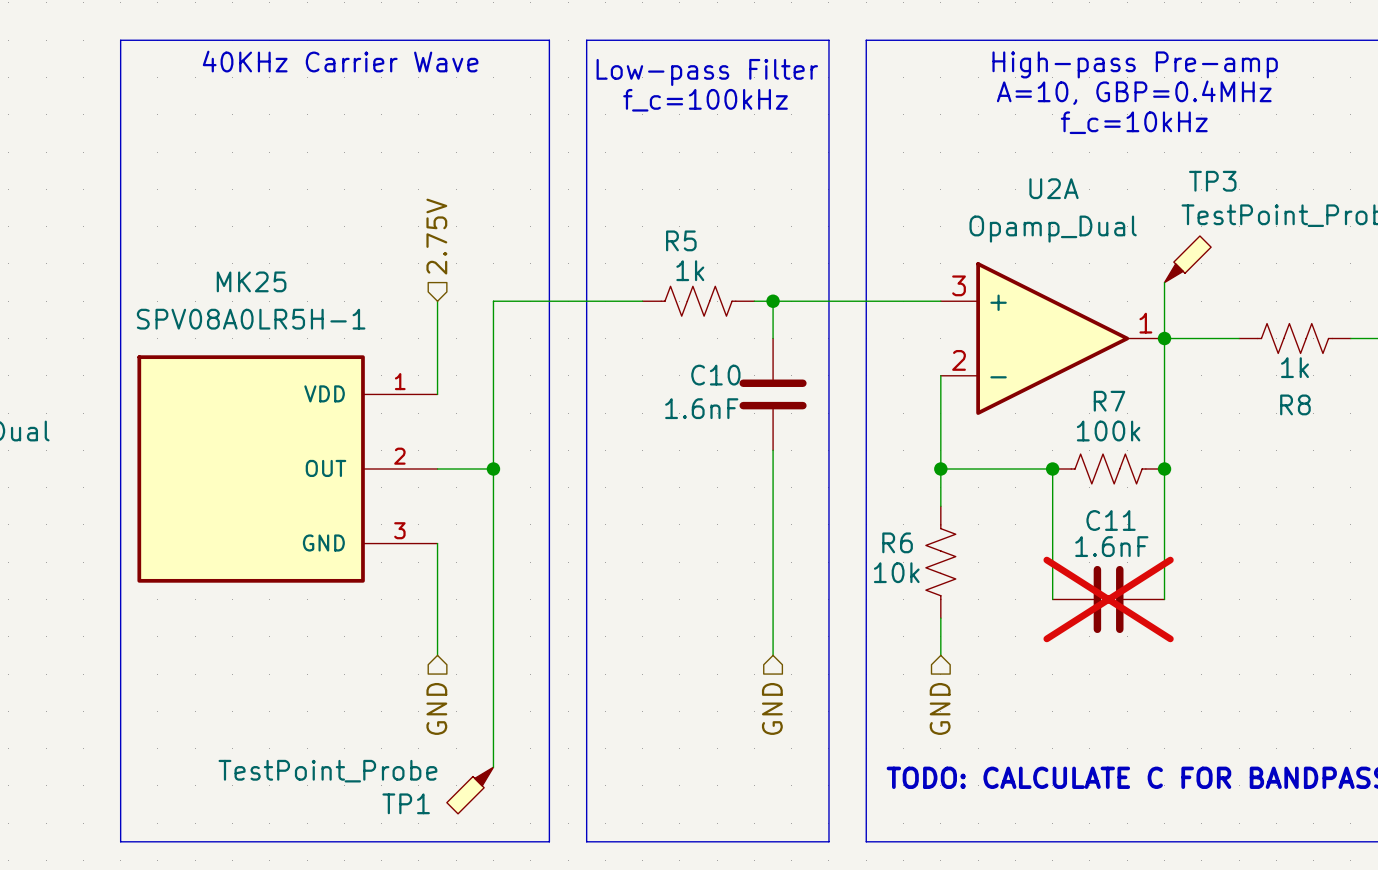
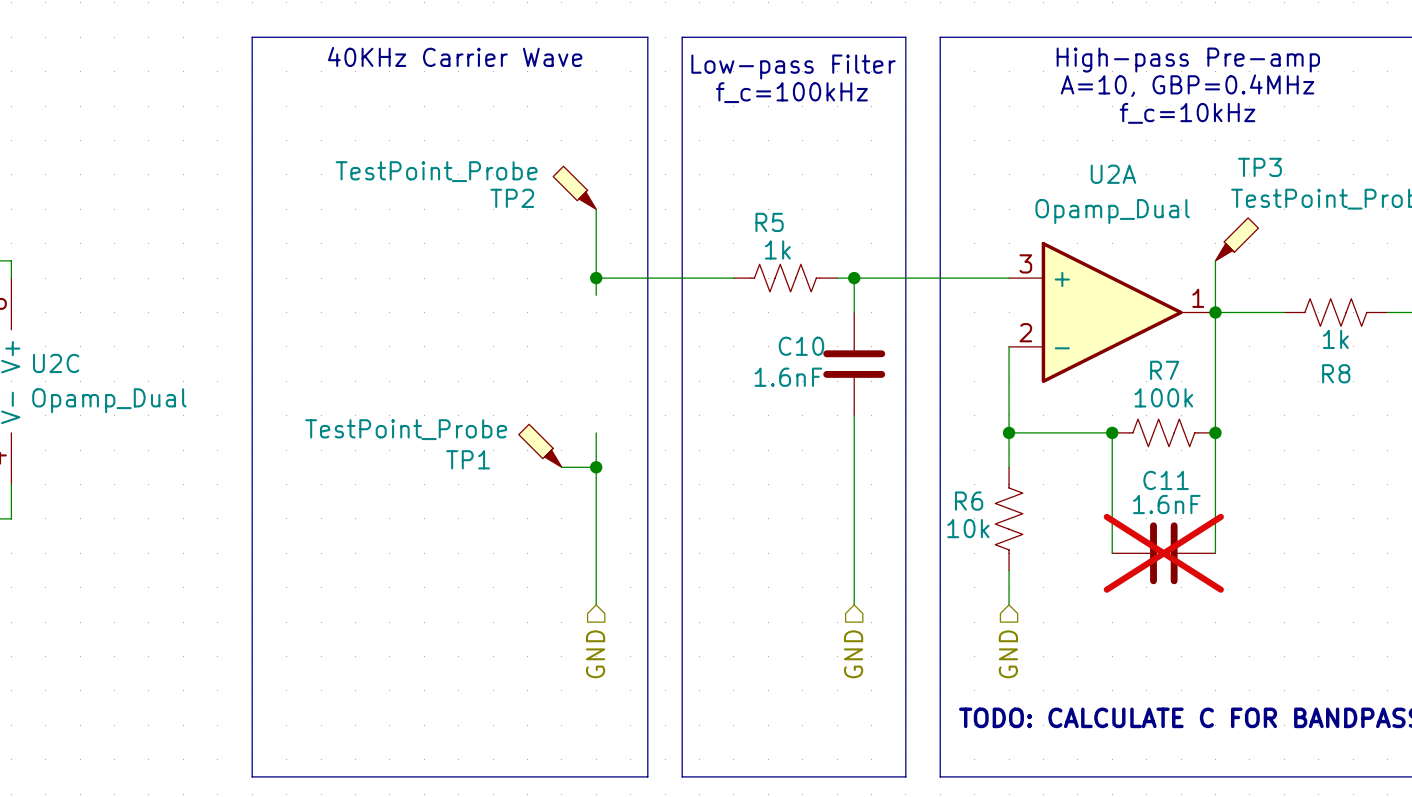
TP2: none -> TestPoint_Probe (574, 187)
wire: none -> (596, 209) (596, 278)
hierarchical label: 2.75V (436, 236) -> none
wire: (437, 301) (437, 394) -> none
junction: none -> (596, 278)
wire: (493, 319) (493, 468) (437, 468) -> none
MK25: SPV08A0LR5H-1 (287, 468) -> none
junction position: (493, 468) -> (596, 467)
wire: none -> (561, 467) (596, 467)
wire: (437, 543) (437, 655) -> none
wire: (493, 655) (493, 767) -> none
hierarchical label position: GND (436, 708) -> GND (595, 654)
TP1 rotation: 0° (470, 790) -> 90° clockwise (540, 445)
TP1 position: (470, 790) -> (540, 445)

